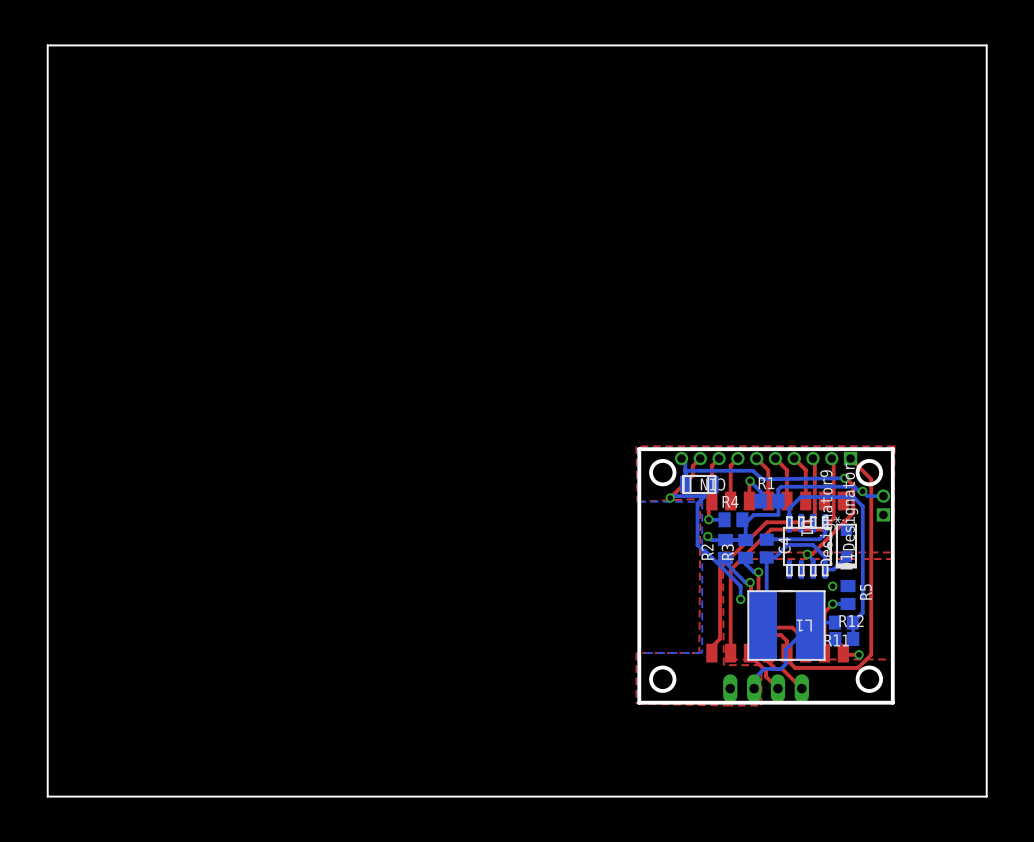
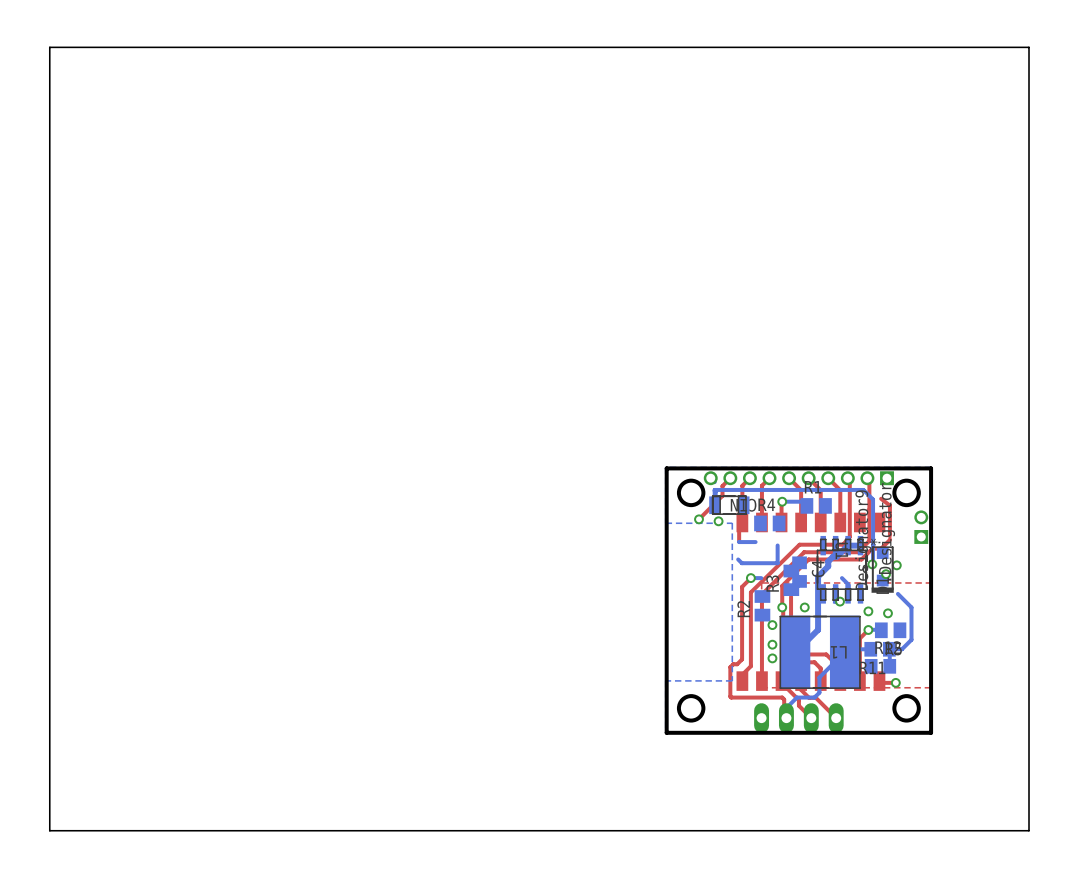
top zone outline: (894, 446) (636, 446) (637, 501) (700, 498) (699, 652) (636, 652) (636, 703) (761, 705) (761, 665) (723, 665) (722, 552) (892, 552) (894, 446) -> none
top track: (853, 461) (871, 479) (871, 654) (858, 667) (795, 667) (787, 660) -> none
bottom track: (685, 462) (686, 470) (752, 470) (762, 479) (844, 478) -> none
bottom track: none -> (714, 489) (863, 489) (873, 499) (872, 564)
via: (844, 478) -> none
bottom track: (750, 481) (761, 492) (760, 501) -> (782, 501) (802, 501) (806, 505)
via: (862, 491) -> none
bottom track: (883, 496) (867, 496) (854, 486) (781, 486) (778, 489) (778, 514) (753, 514) (745, 523) (742, 519) -> none
bottom track: (670, 498) (674, 496) (705, 496) (697, 503) (697, 544) (740, 586) (740, 599) -> none
via: none -> (718, 521)
R1 position: (769, 501) -> (816, 505)
top track: (853, 513) (812, 554) (807, 554) -> (889, 535) (889, 539) (881, 548) (872, 548) (861, 559) (808, 559) (782, 585) (782, 607)
via: (708, 519) -> none
R4 position: (733, 519) -> (769, 523)
bottom track: (789, 523) (789, 508) (800, 497) (853, 497) (862, 506) (862, 612) (852, 622) -> (897, 593) (911, 607) (911, 639) (901, 649) (889, 649)
bottom track: (825, 523) (825, 533) (819, 539) (766, 539) -> (860, 545) (847, 545) (836, 556) (833, 556) (828, 561) (828, 566) (818, 576) (818, 629) (795, 652) (793, 650)
via: (707, 536) -> none
via: none -> (872, 564)
via: none -> (896, 565)
R2 position: (725, 548) -> (762, 605)
R3 position: (745, 548) -> (791, 580)
via: none -> (886, 574)
top track: none -> (750, 578) (742, 586) (742, 659) (730, 667) (730, 696) (782, 697) (784, 699) (784, 715) (786, 718)
via: none -> (750, 578)
bottom track: none -> (761, 578) (750, 578)
via: (807, 554) -> none
bottom track: (846, 556) (833, 569) (825, 569) (825, 557) (813, 544) (787, 544) (775, 557) (766, 557) (766, 625) -> none
bottom track: (725, 557) (725, 562) (745, 582) (750, 582) -> none
bottom track: (745, 557) (745, 564) (753, 572) (758, 572) -> none
via position: (758, 572) -> (804, 607)
via: none -> (840, 601)
via: none -> (887, 613)
R5 rotation: 0° (848, 595) -> 90° clockwise (890, 630)
via: none -> (772, 644)
via: none -> (772, 658)

